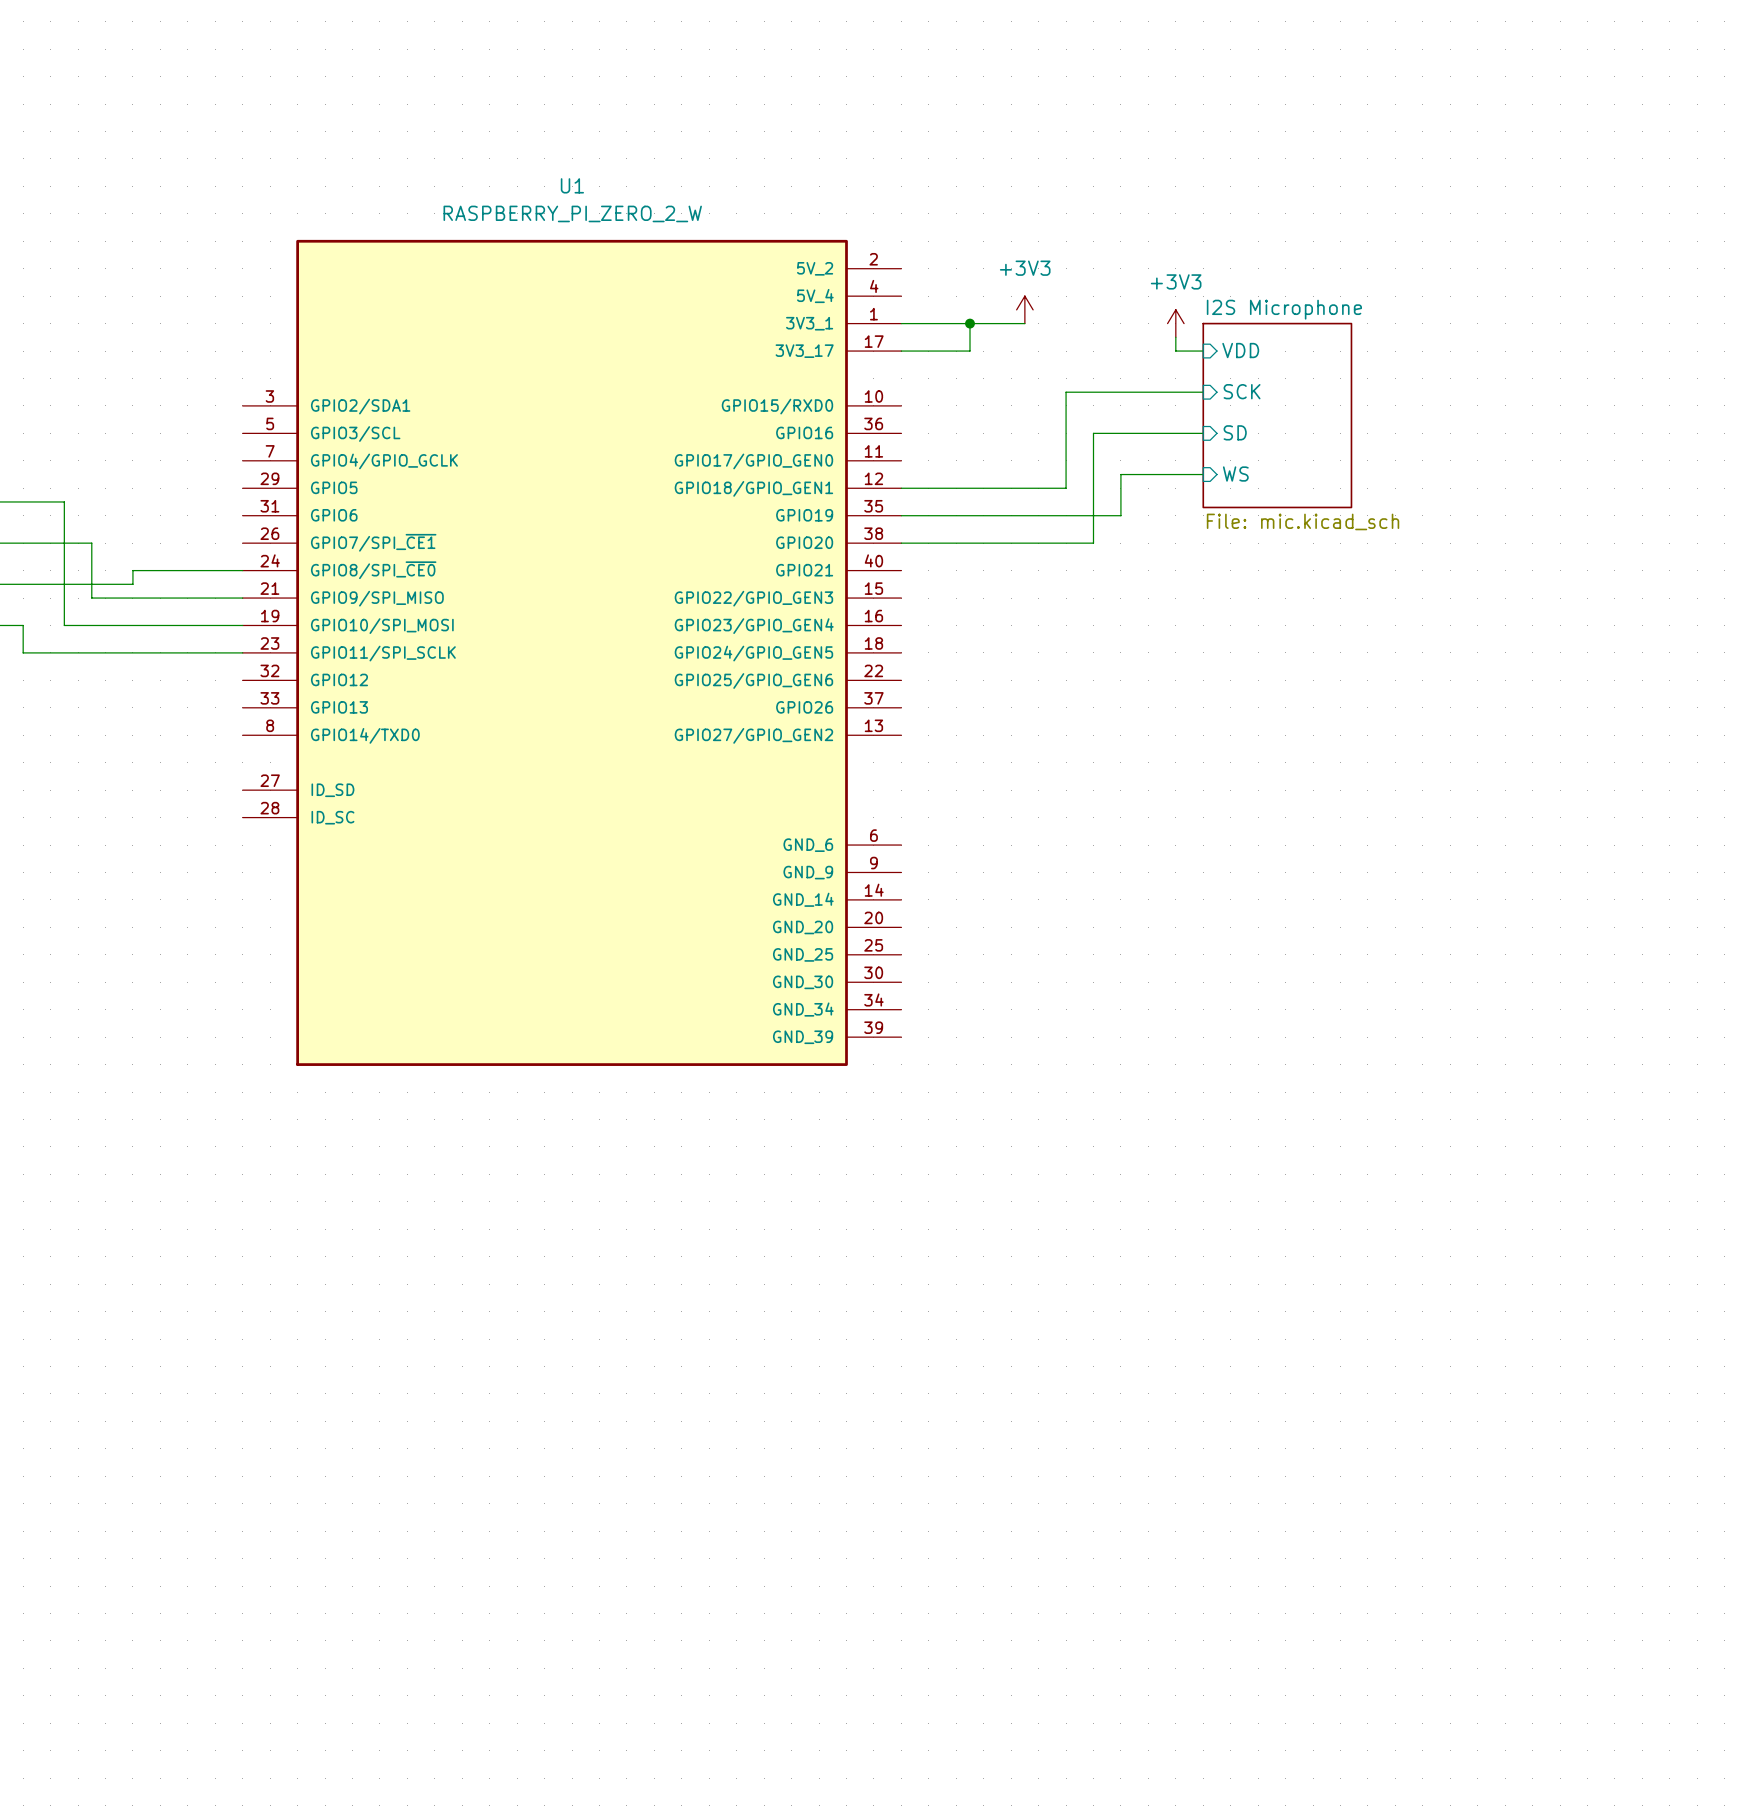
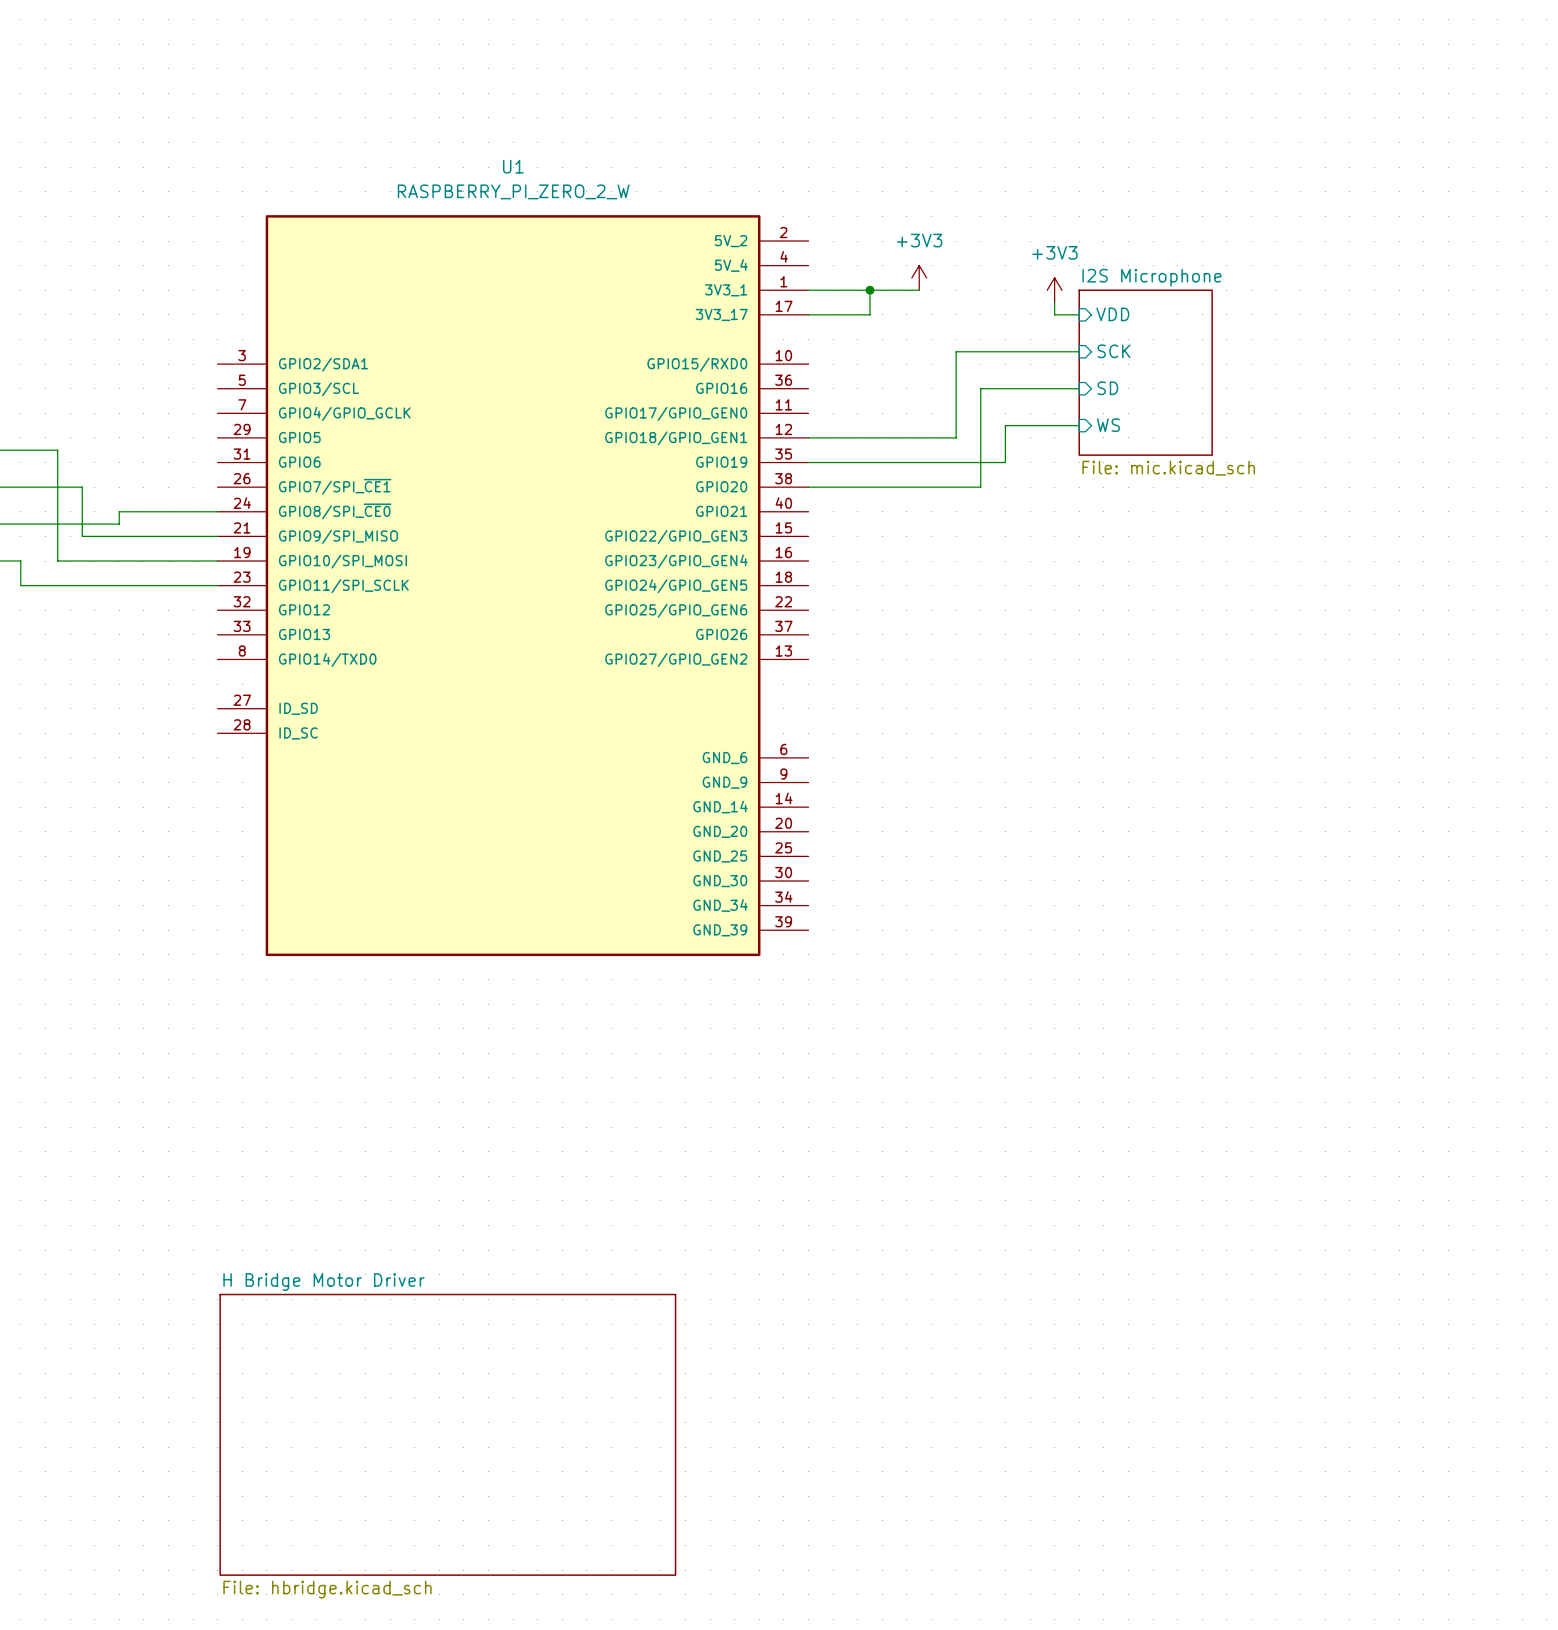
sheet H Bridge Motor Driver: none -> File: hbridge.kicad_sch (447, 1434)

